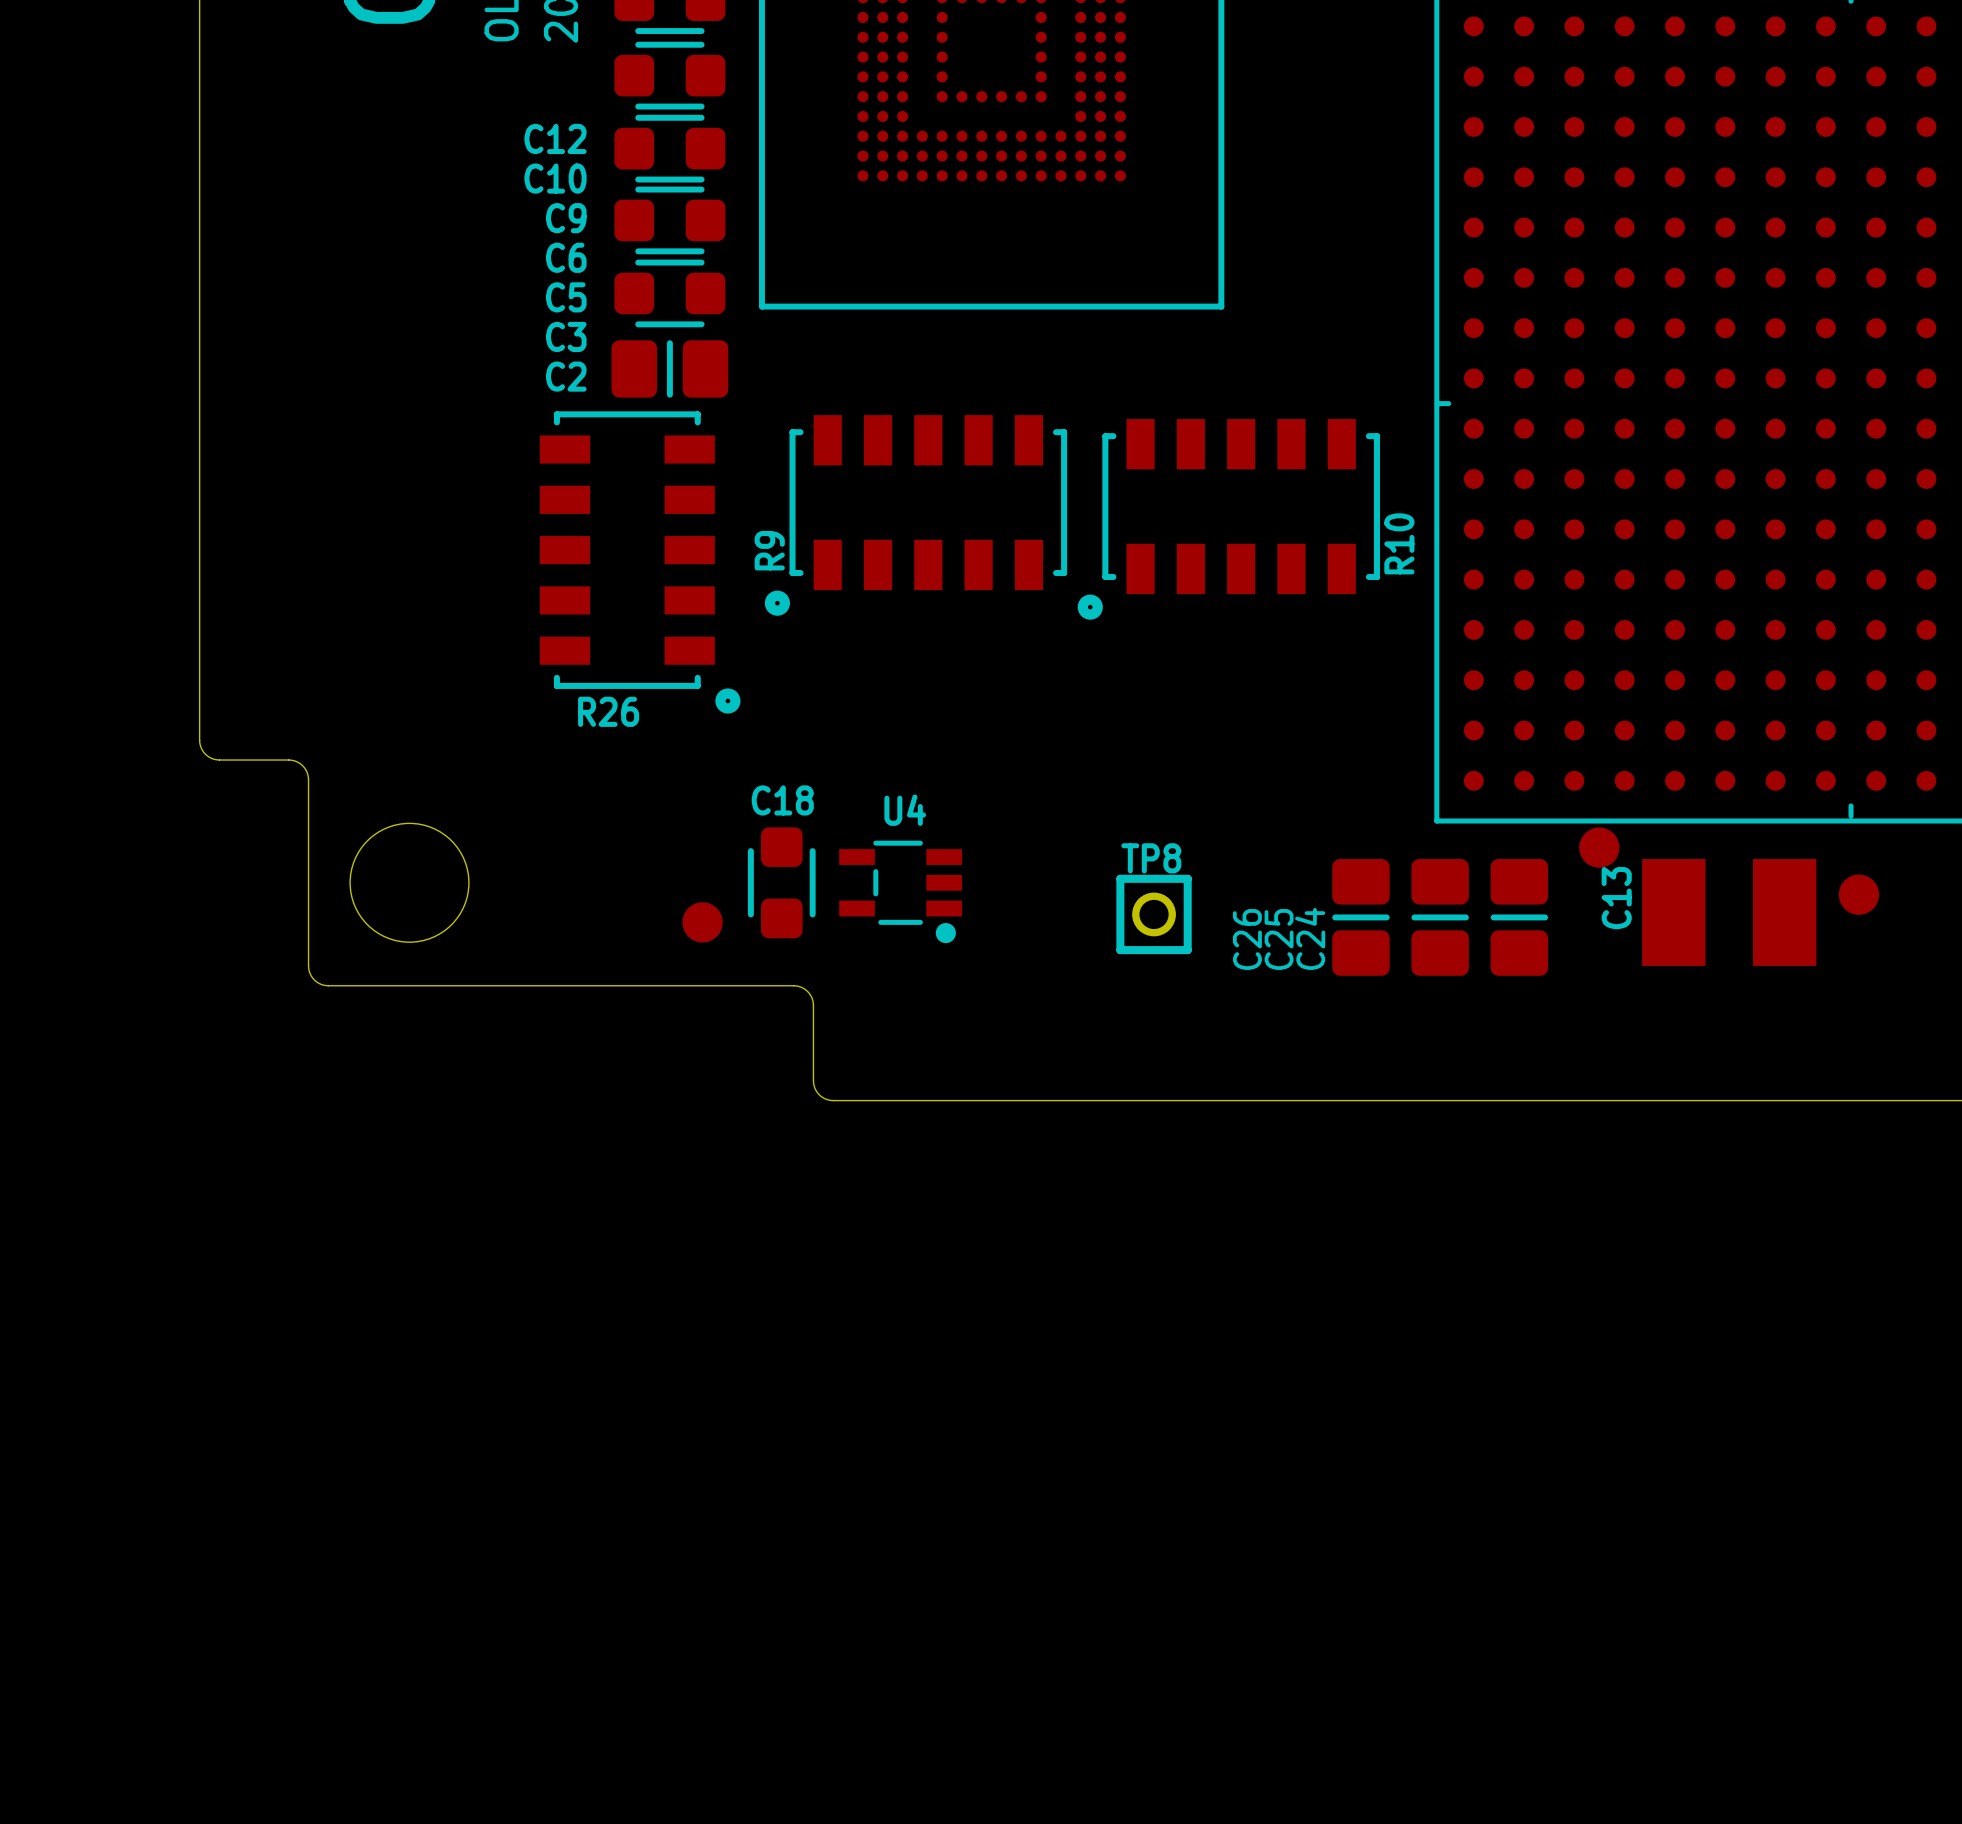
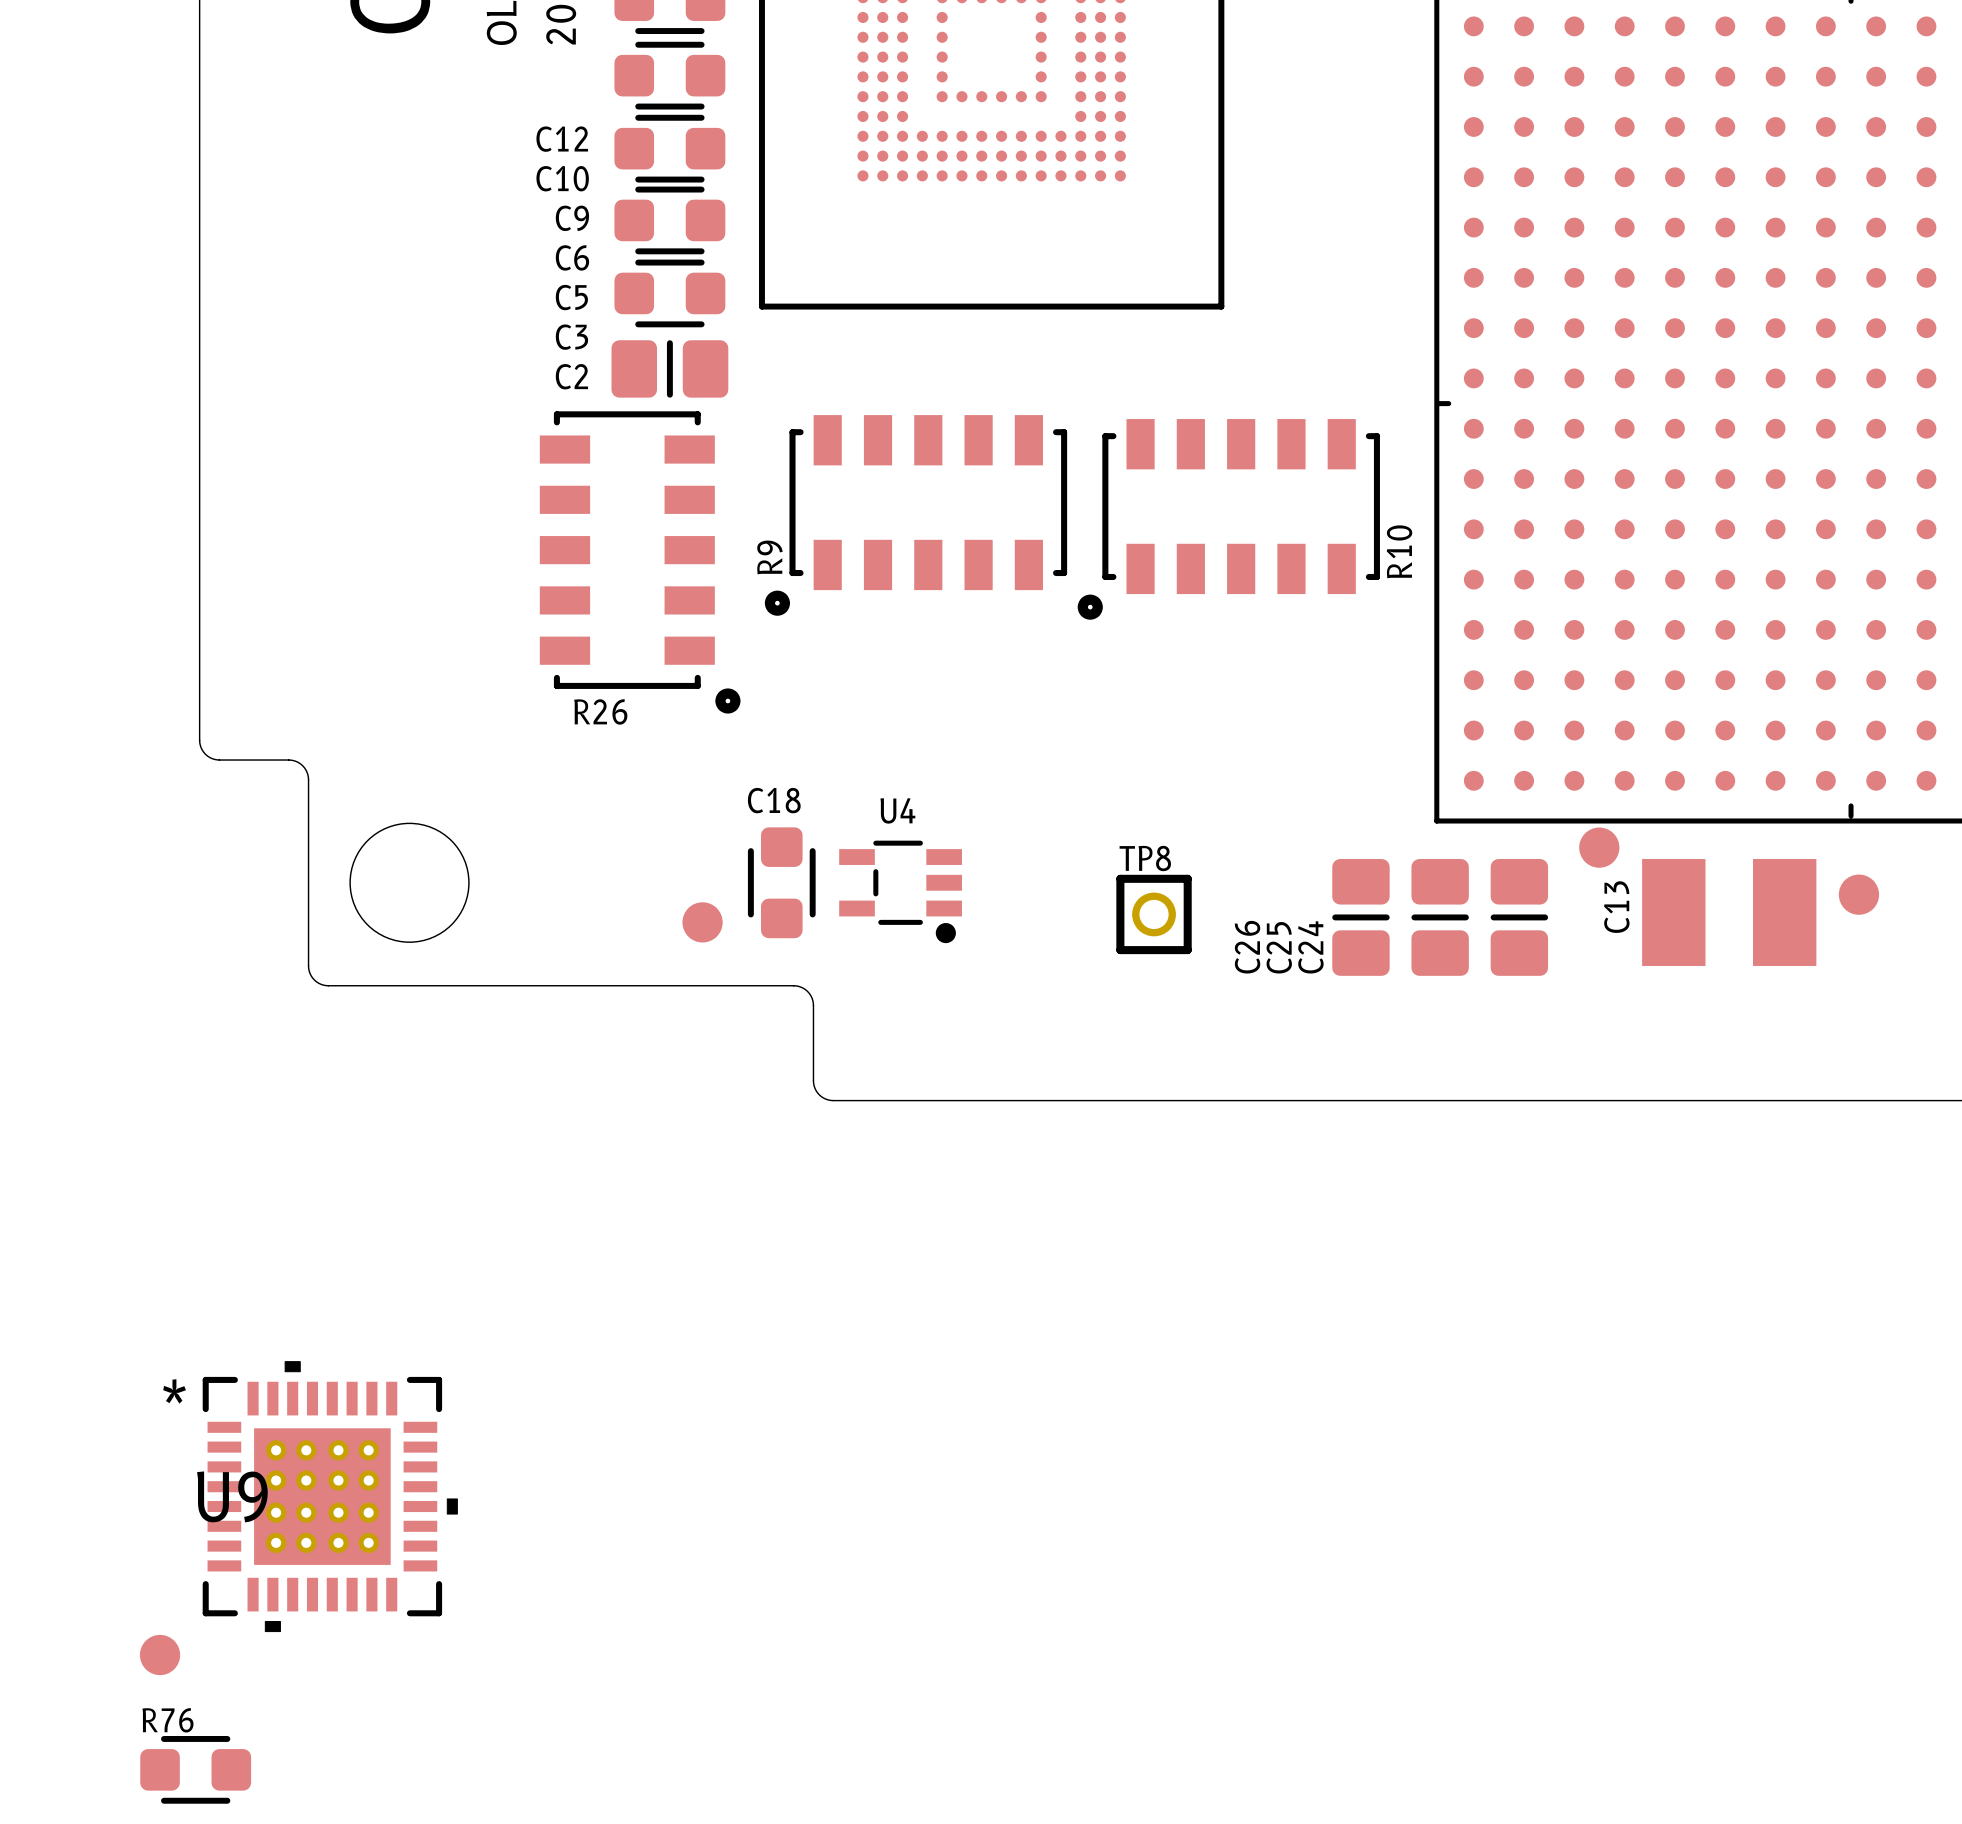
U9: none -> (330, 1496)
part: none -> (160, 1655)
R76: none -> (195, 1769)

